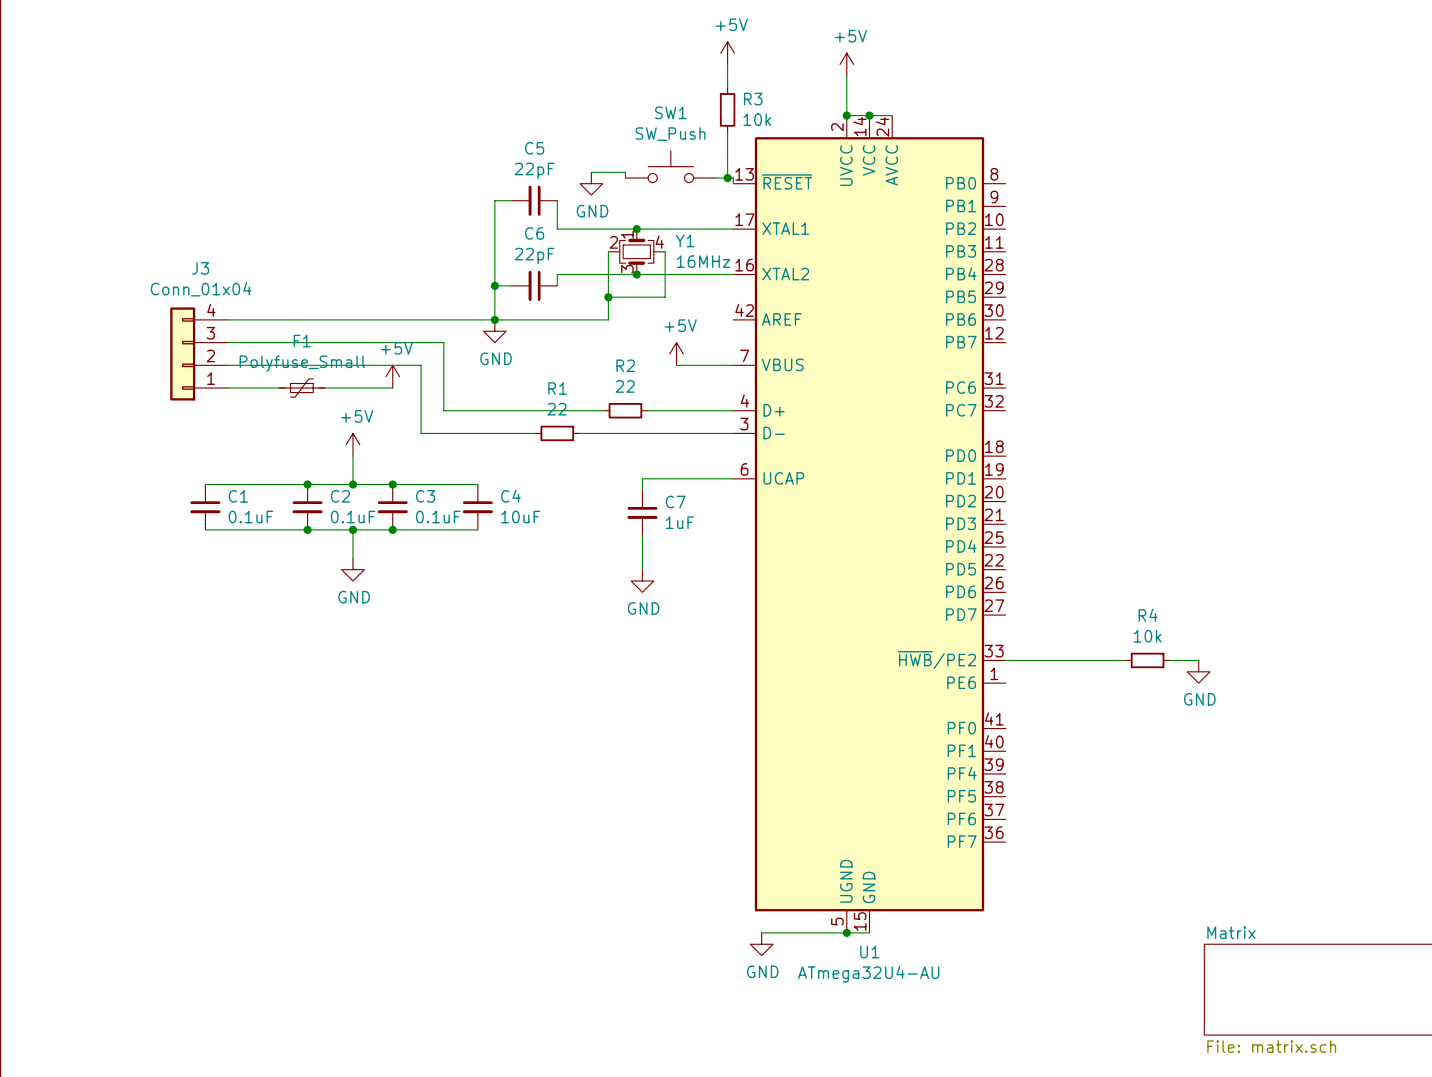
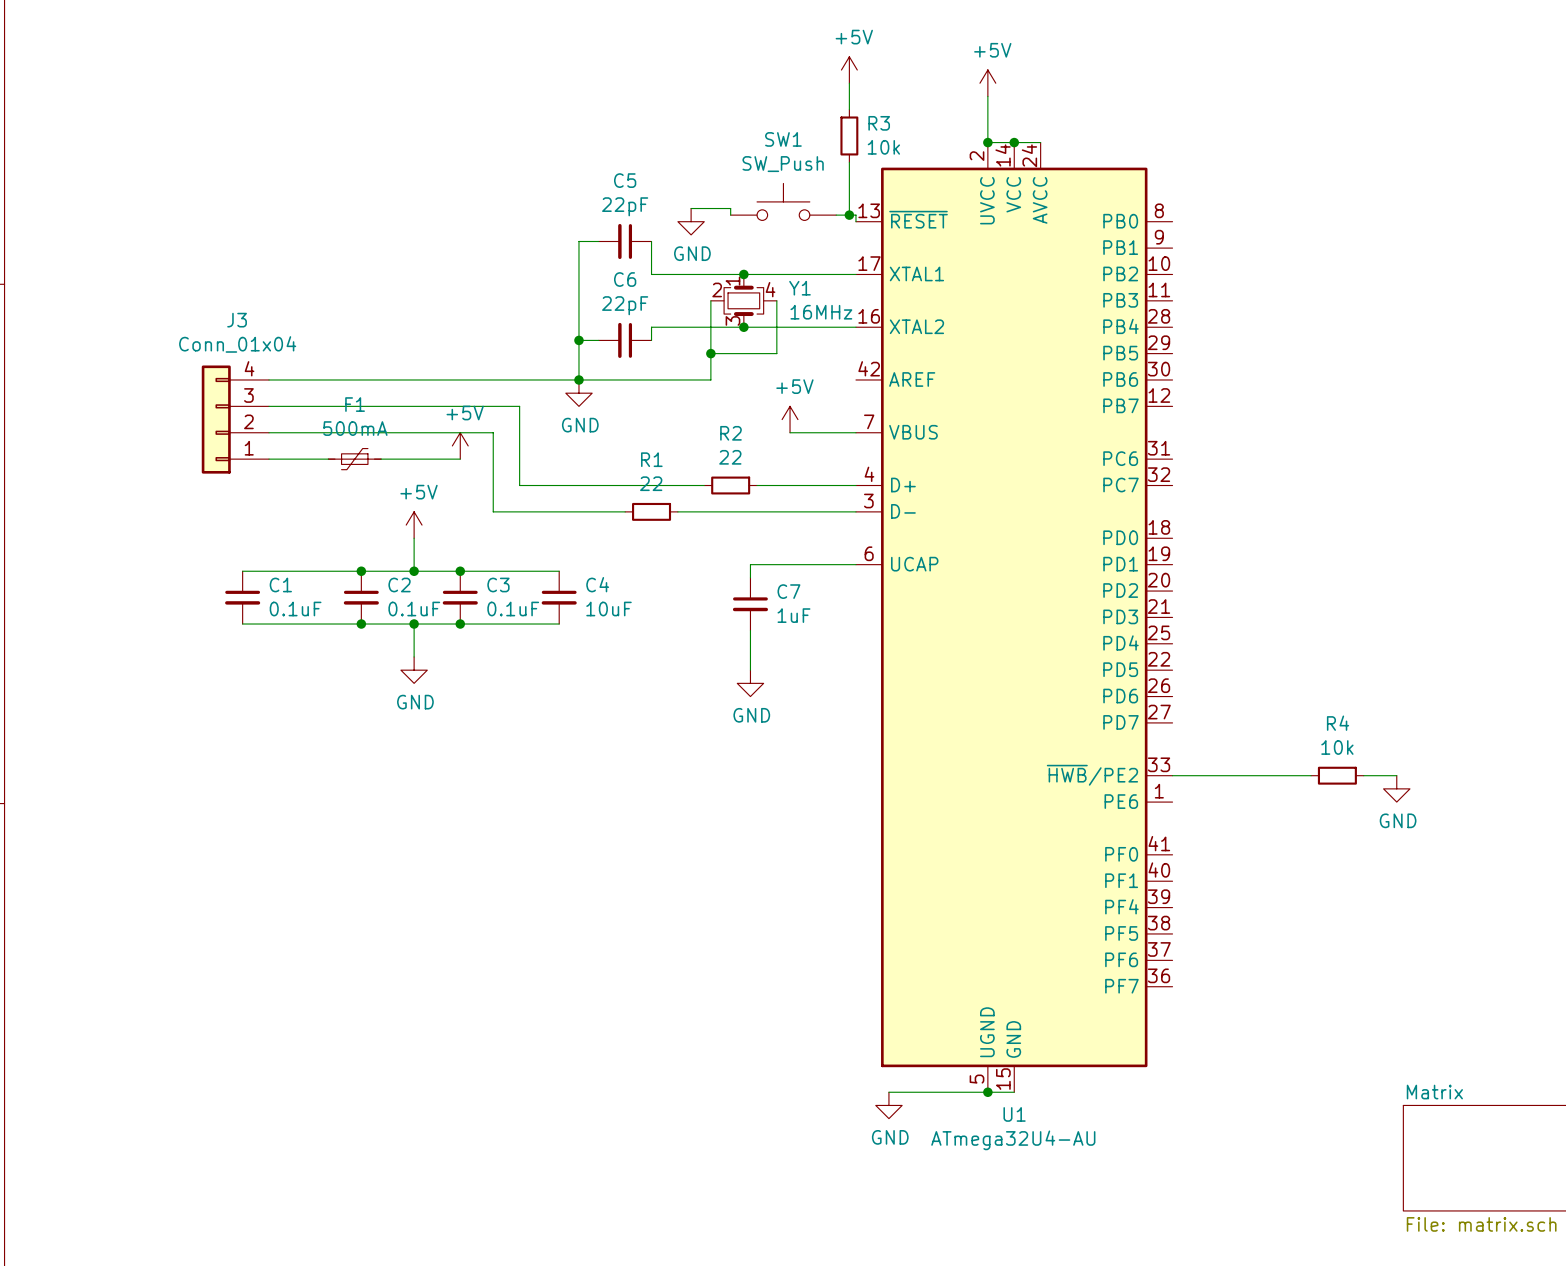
F1 value: Polyfuse_Small (302, 363) -> 500mA (355, 428)

